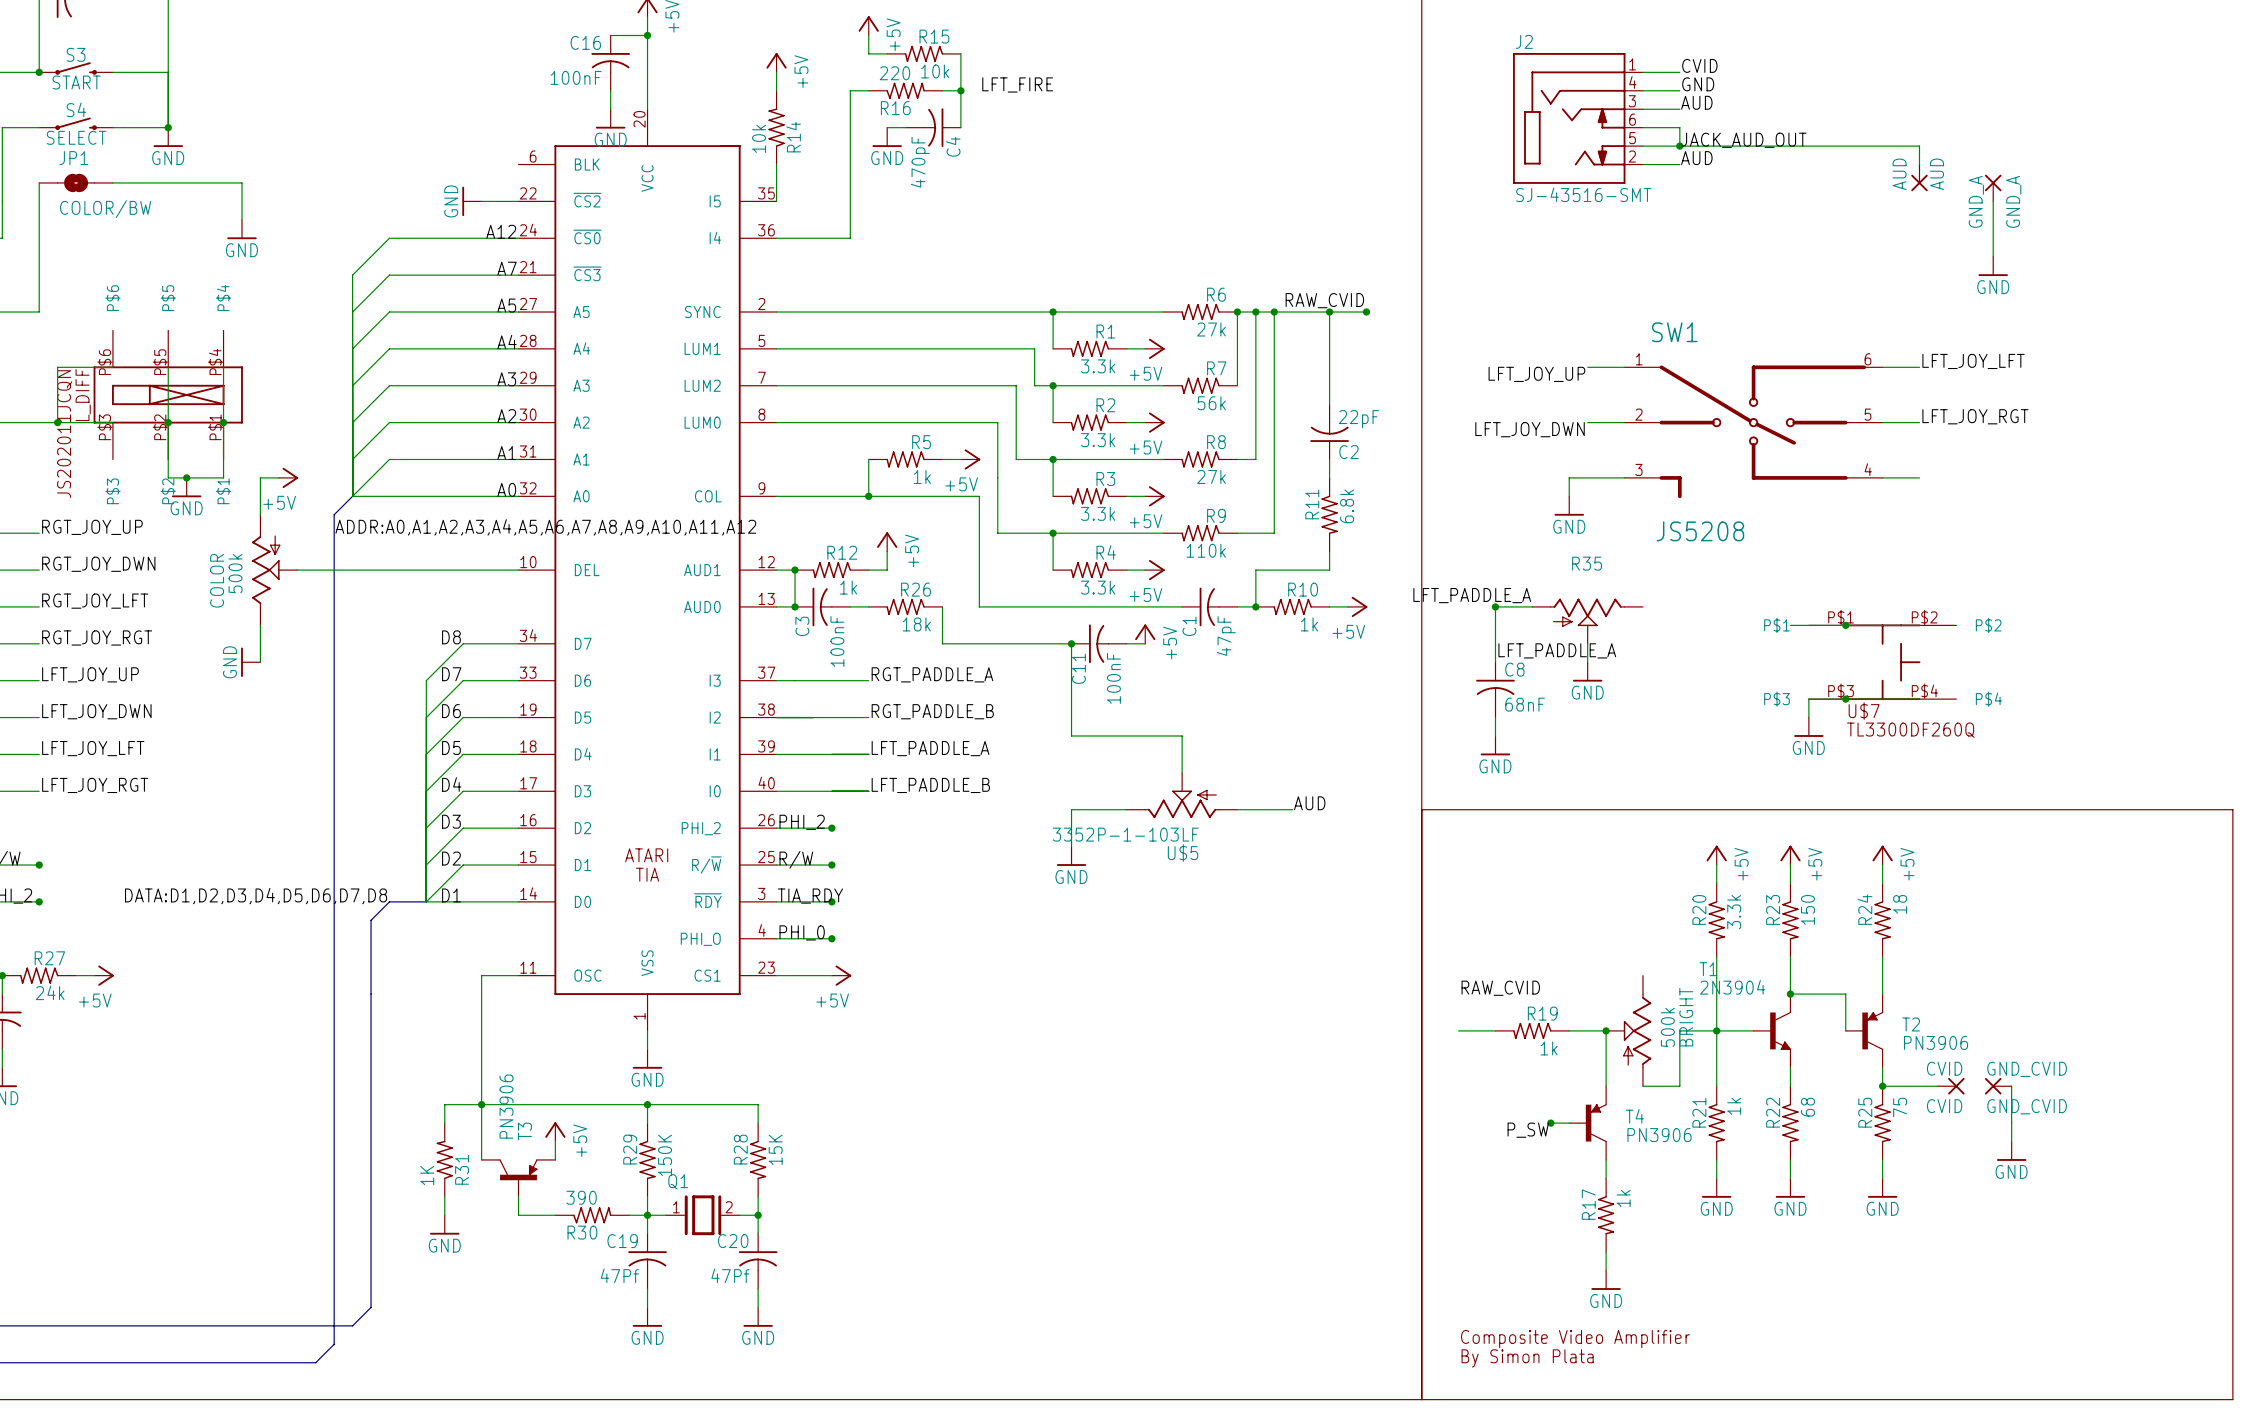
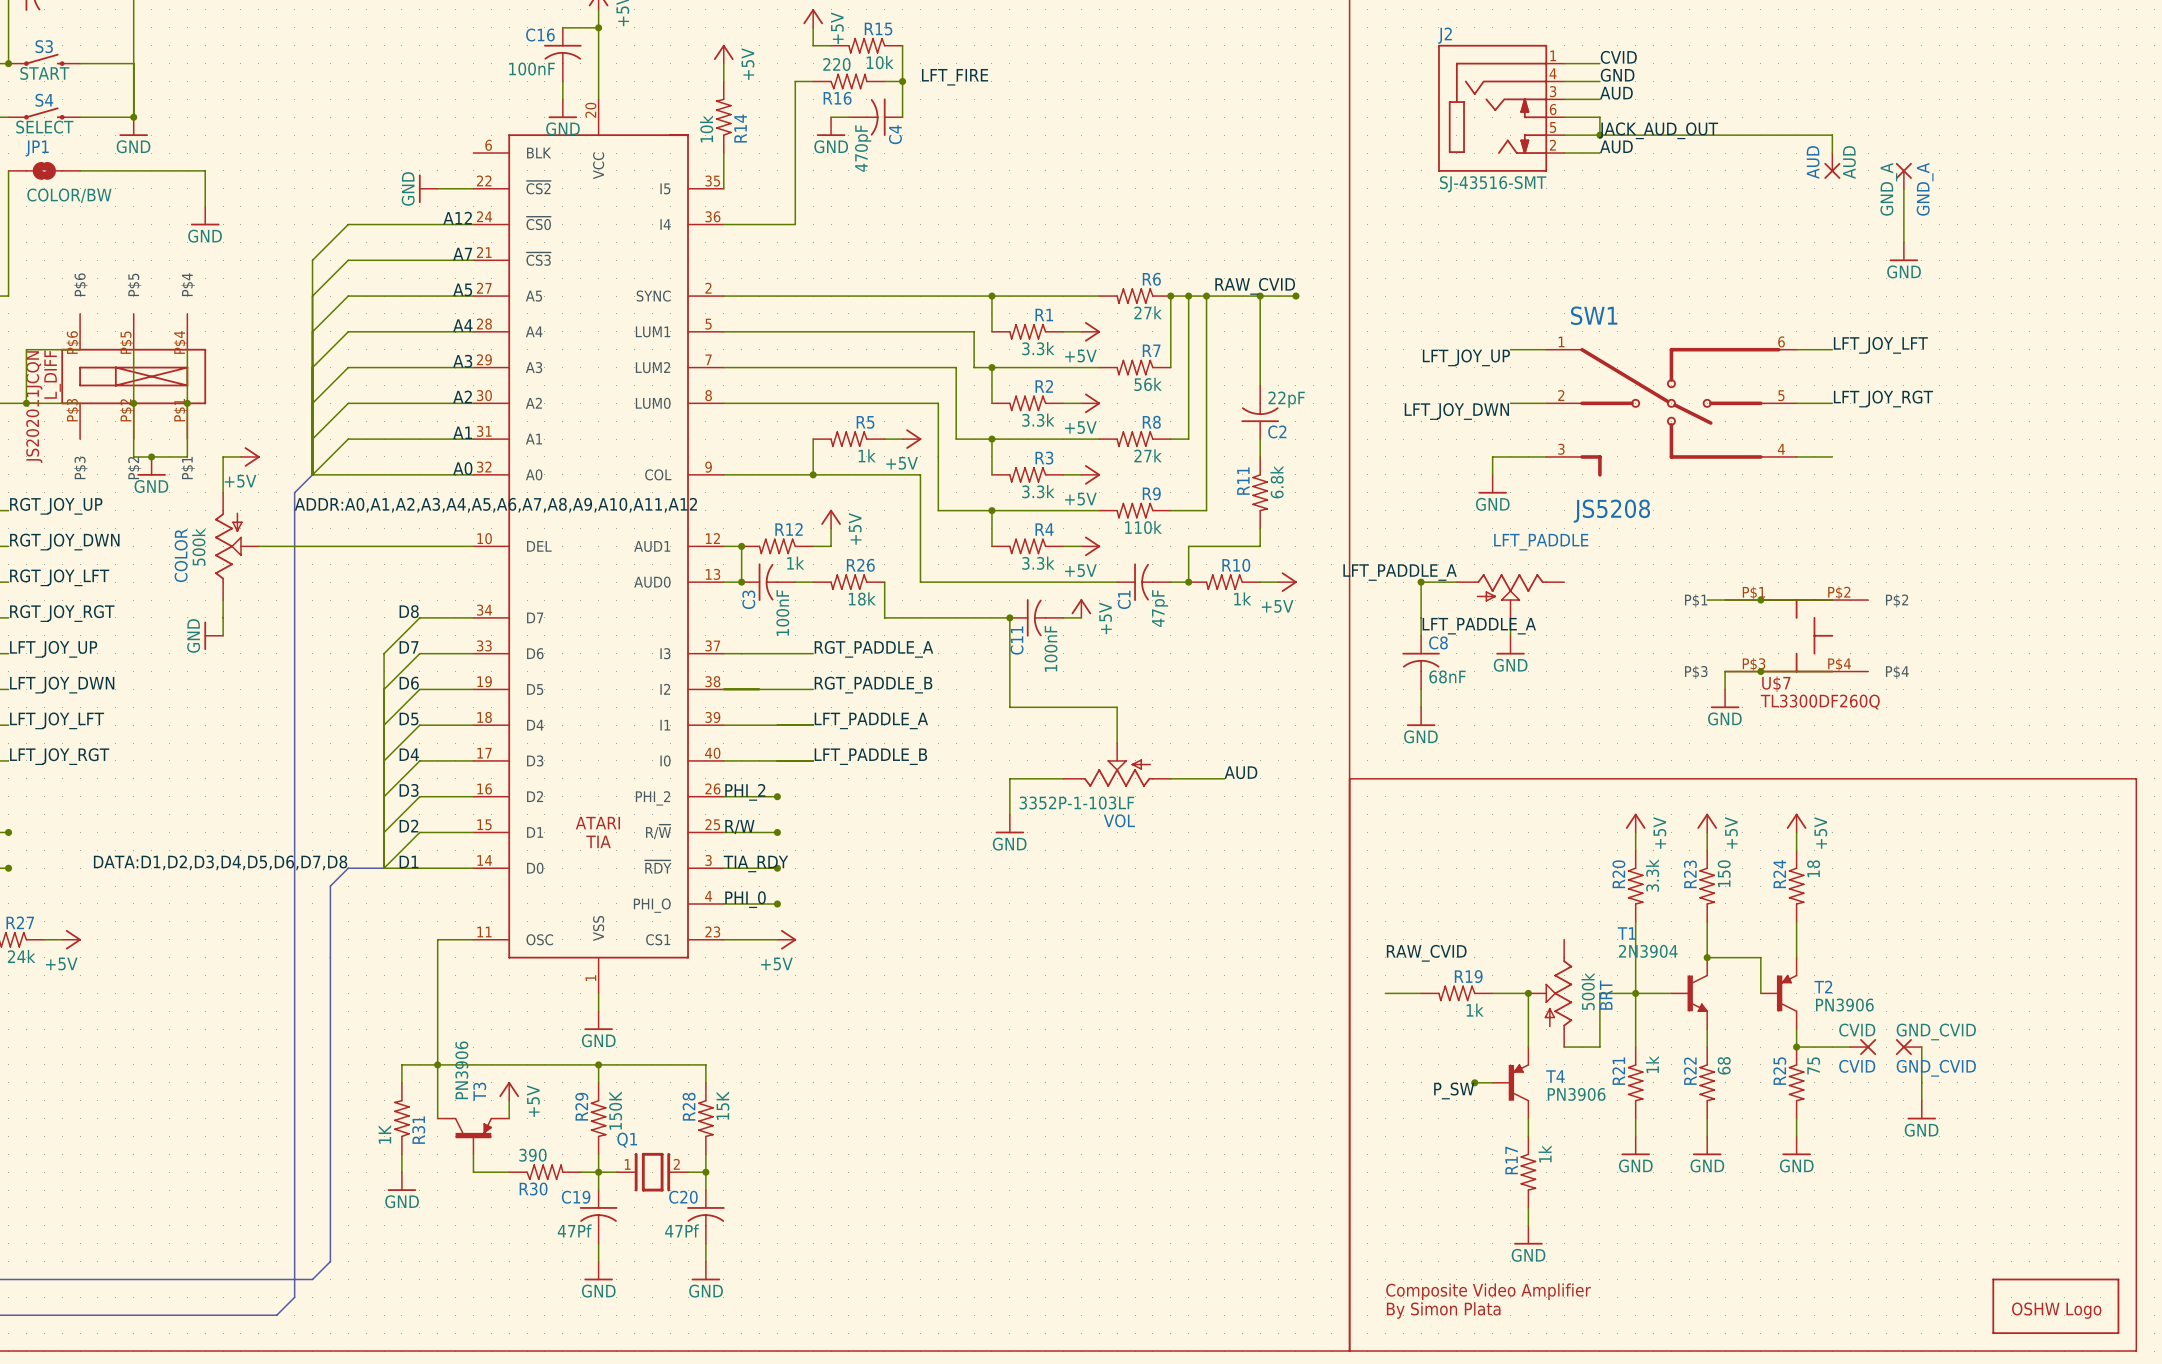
R35 name: R35 (1587, 563) -> LFT_PADDLE (1541, 542)
U$5 name: U$5 (1183, 853) -> VOL (1119, 820)
BRIGHT name: BRIGHT (1686, 1017) -> BRT (1606, 995)
part: none -> (2055, 1306)

